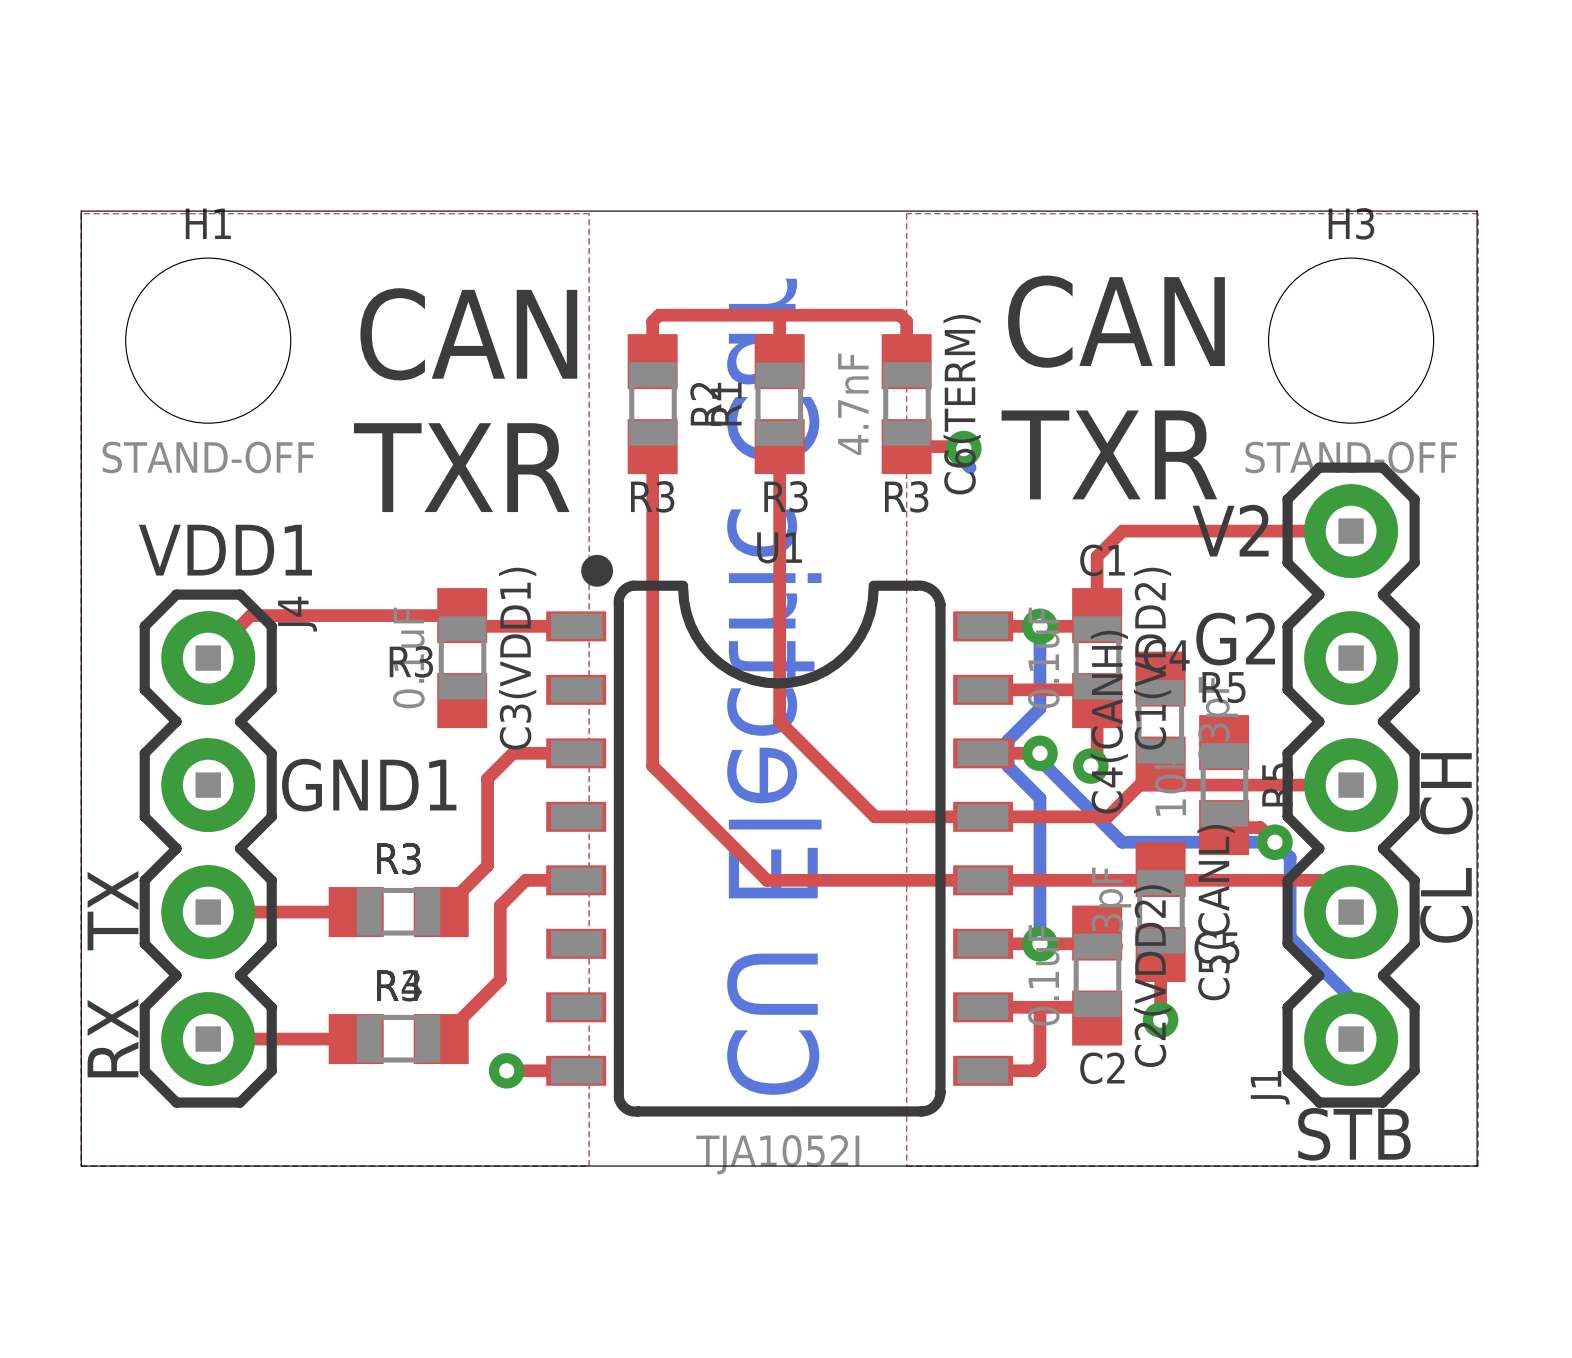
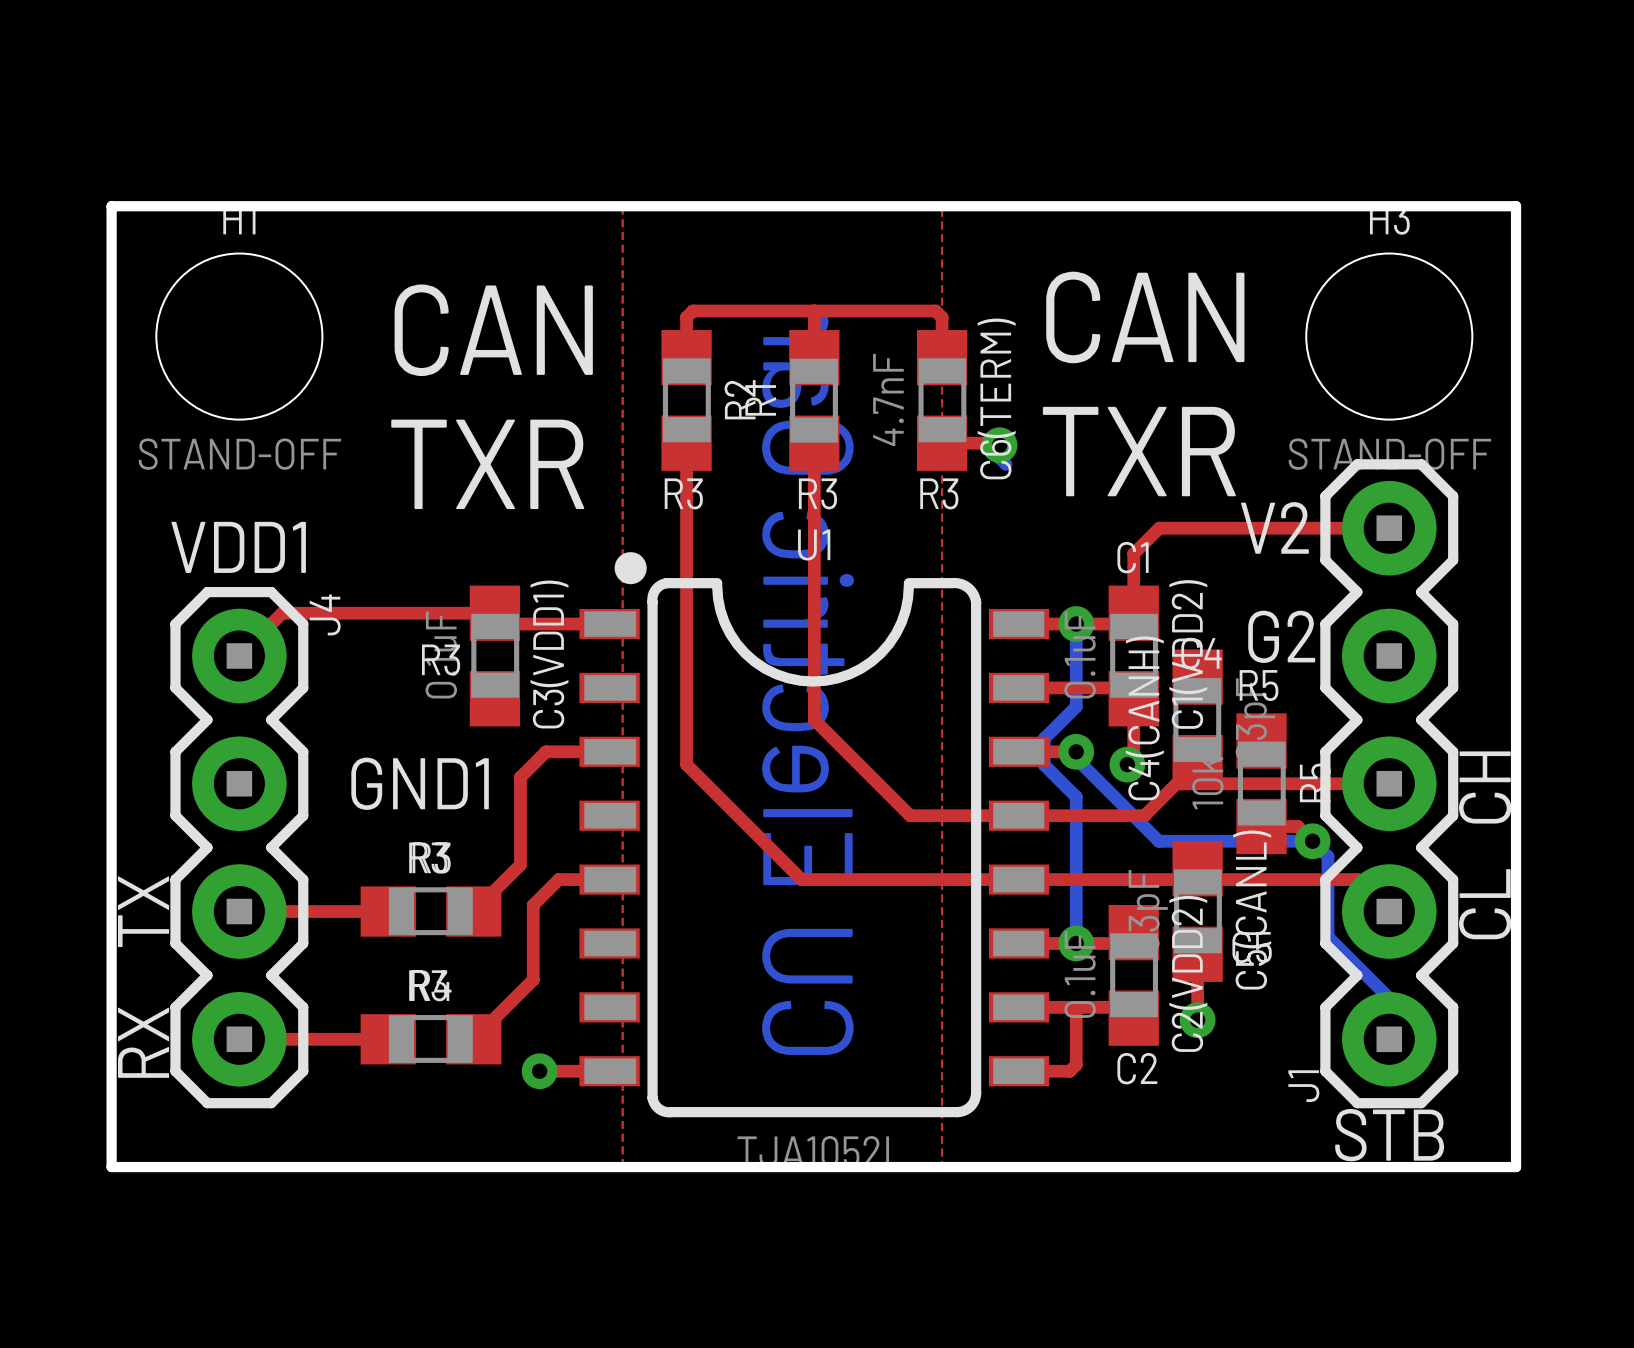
board edge width: thin (81, 211) (1477, 211) (1477, 1166) (81, 1166) (81, 211) -> thick (111, 206) (1516, 206) (1516, 1167) (111, 1167) (111, 206)

